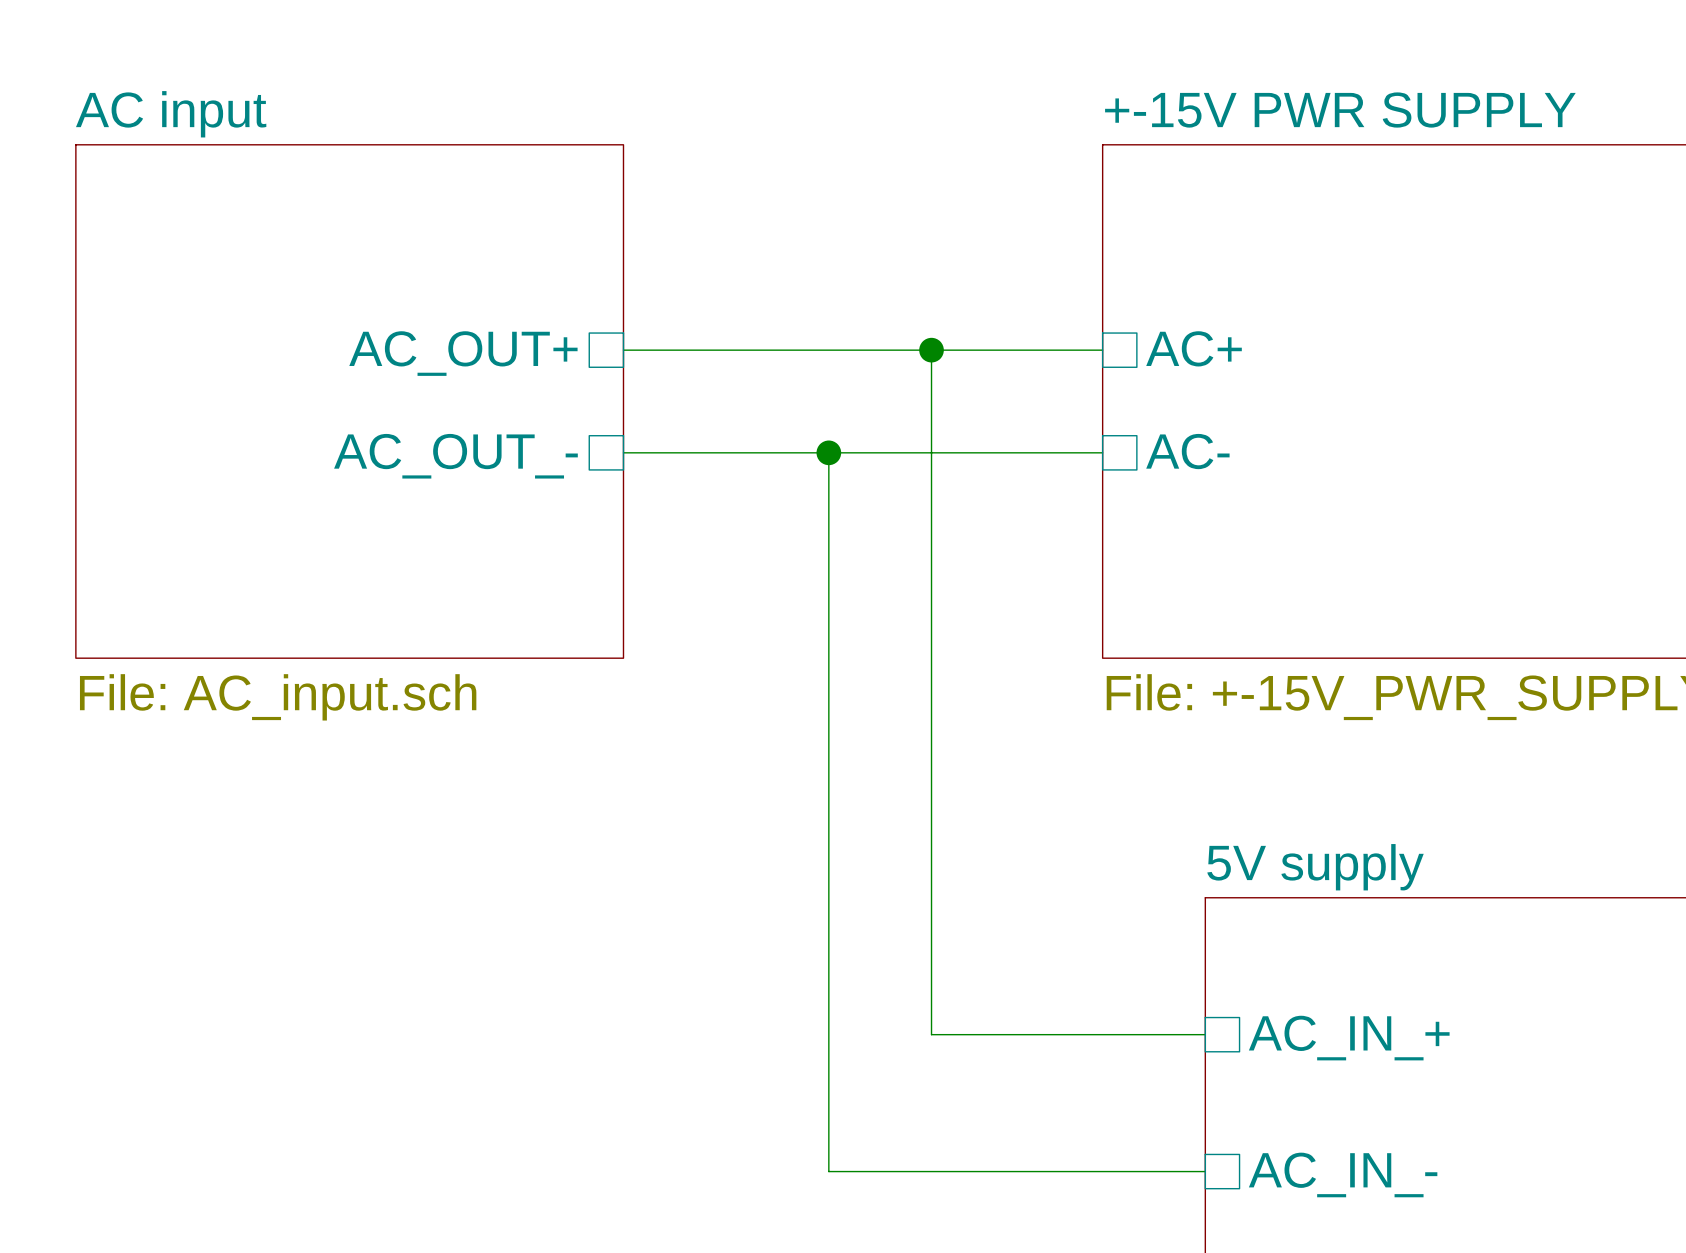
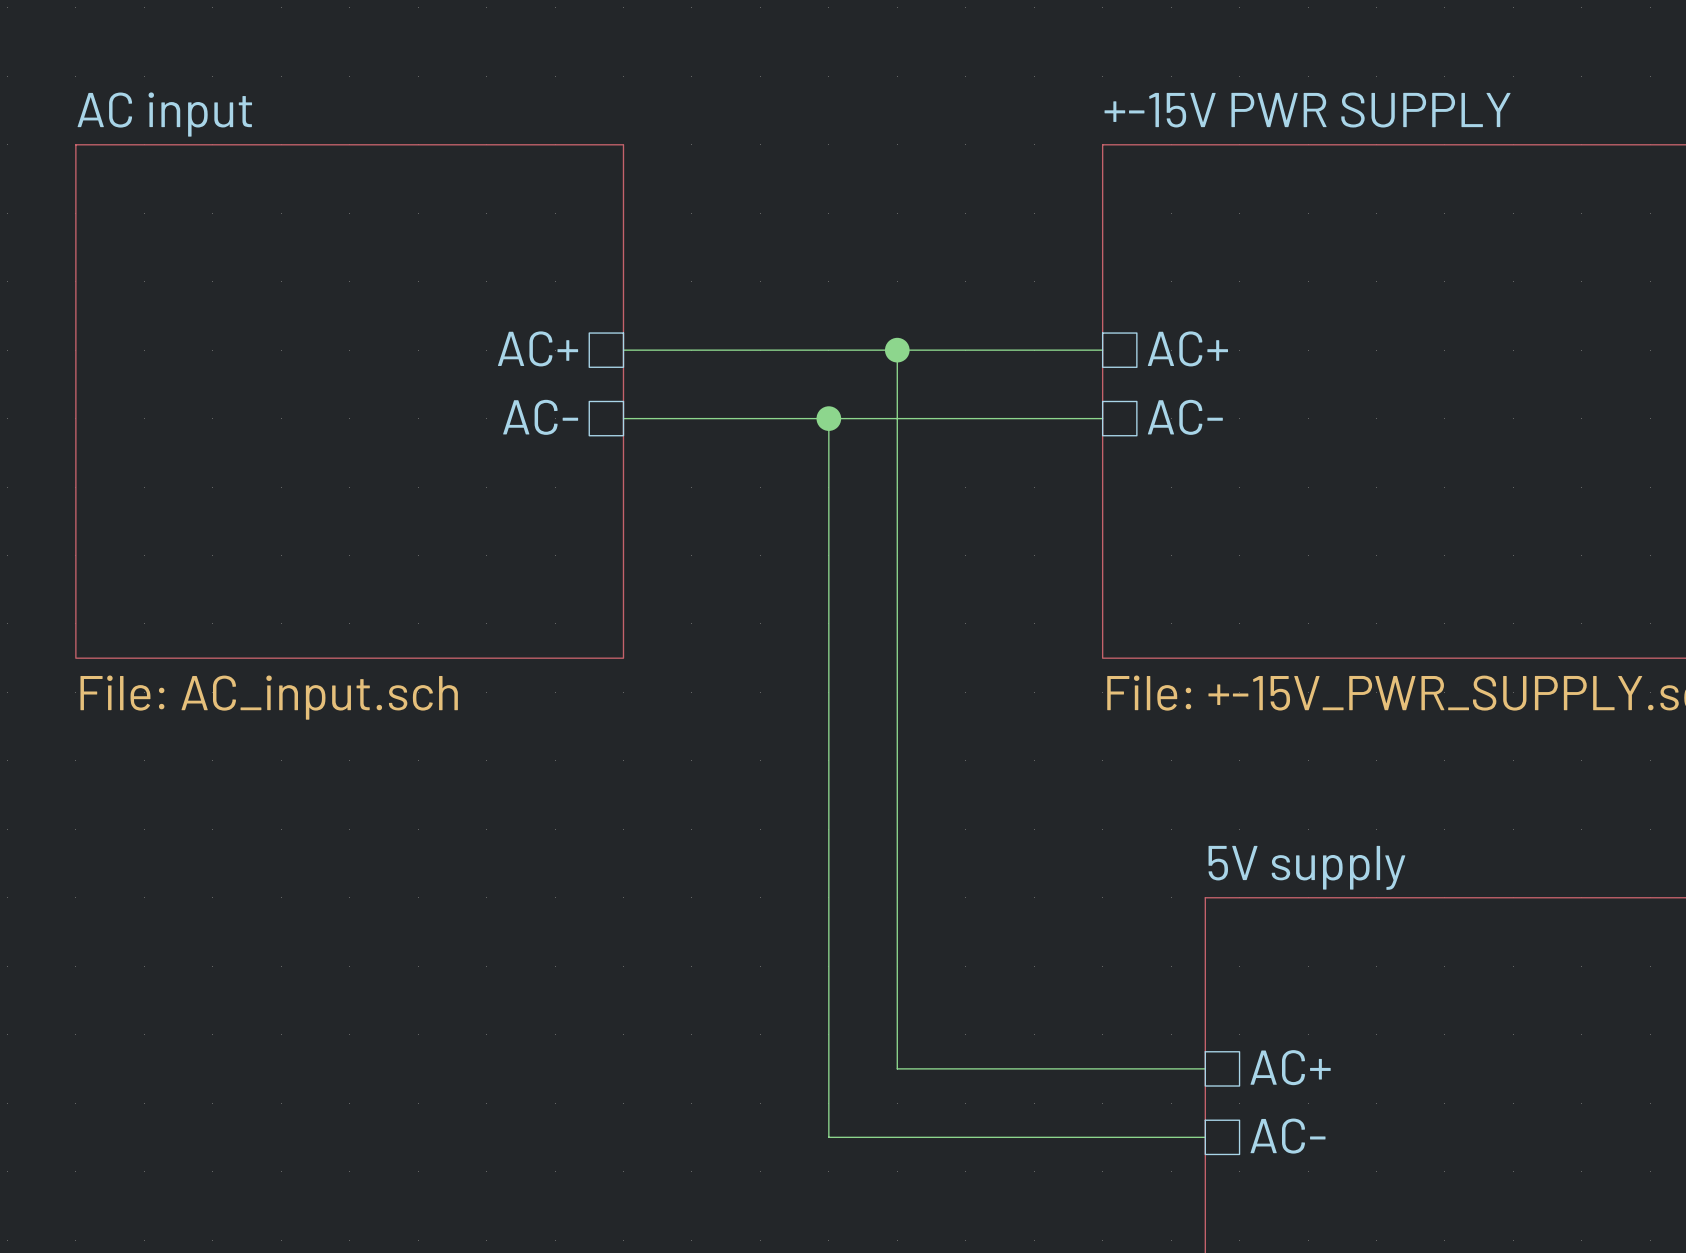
wire: none -> (897, 350) (897, 1068) (1205, 1068)
wire: (931, 350) (931, 1034) (1205, 1034) -> none
junction position: (931, 350) -> (897, 350)
sheet pin: AC_OUT+ (463, 353) -> AC+ (537, 348)
sheet pin: none -> AC- (540, 417)
wire: none -> (828, 418) (828, 452)
sheet pin position: AC- (1187, 451) -> AC- (1185, 417)
wire: (623, 452) (1102, 452) -> (623, 418) (1102, 418)
junction position: (828, 452) -> (828, 418)
sheet pin: AC_OUT_- (455, 456) -> none
sheet pin: AC_IN_+ (1349, 1038) -> none
sheet pin: none -> AC+ (1290, 1067)
sheet pin: none -> AC- (1287, 1136)
wire: (828, 1137) (828, 1171) (1205, 1171) -> (828, 1137) (1205, 1137)
sheet pin: AC_IN_- (1343, 1174) -> none

